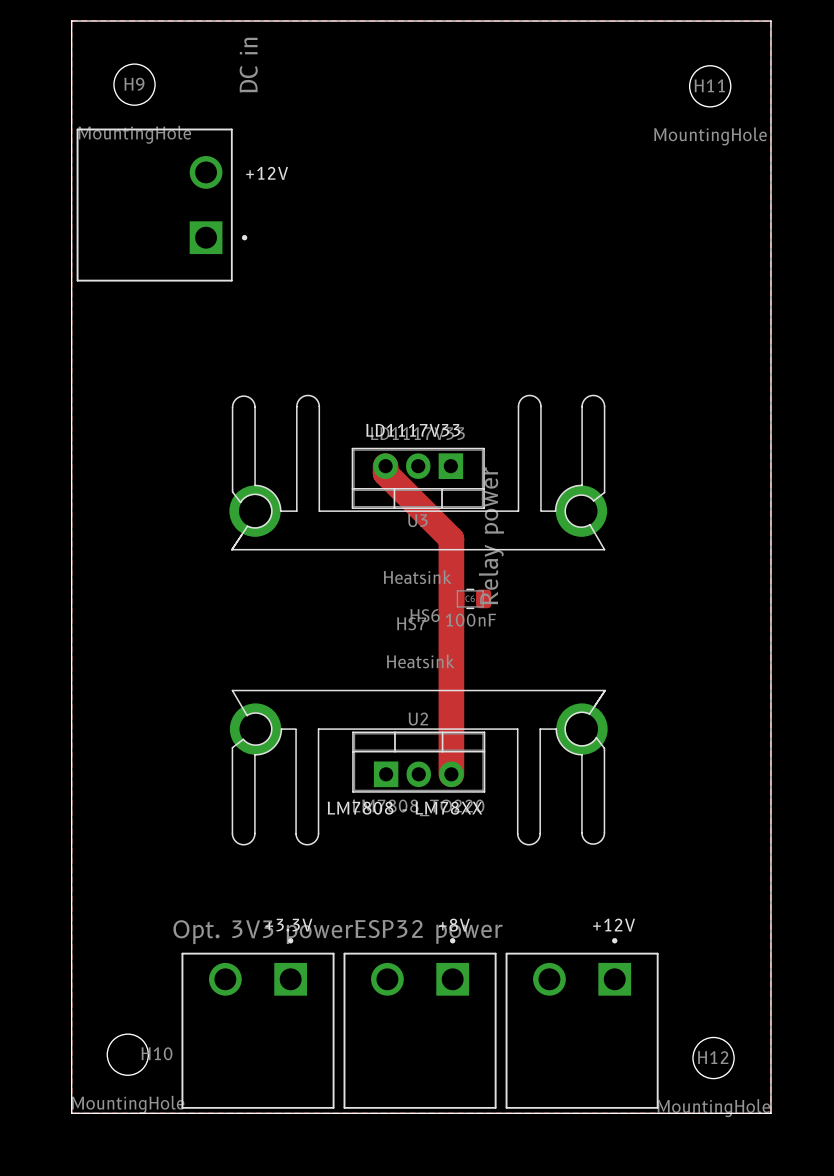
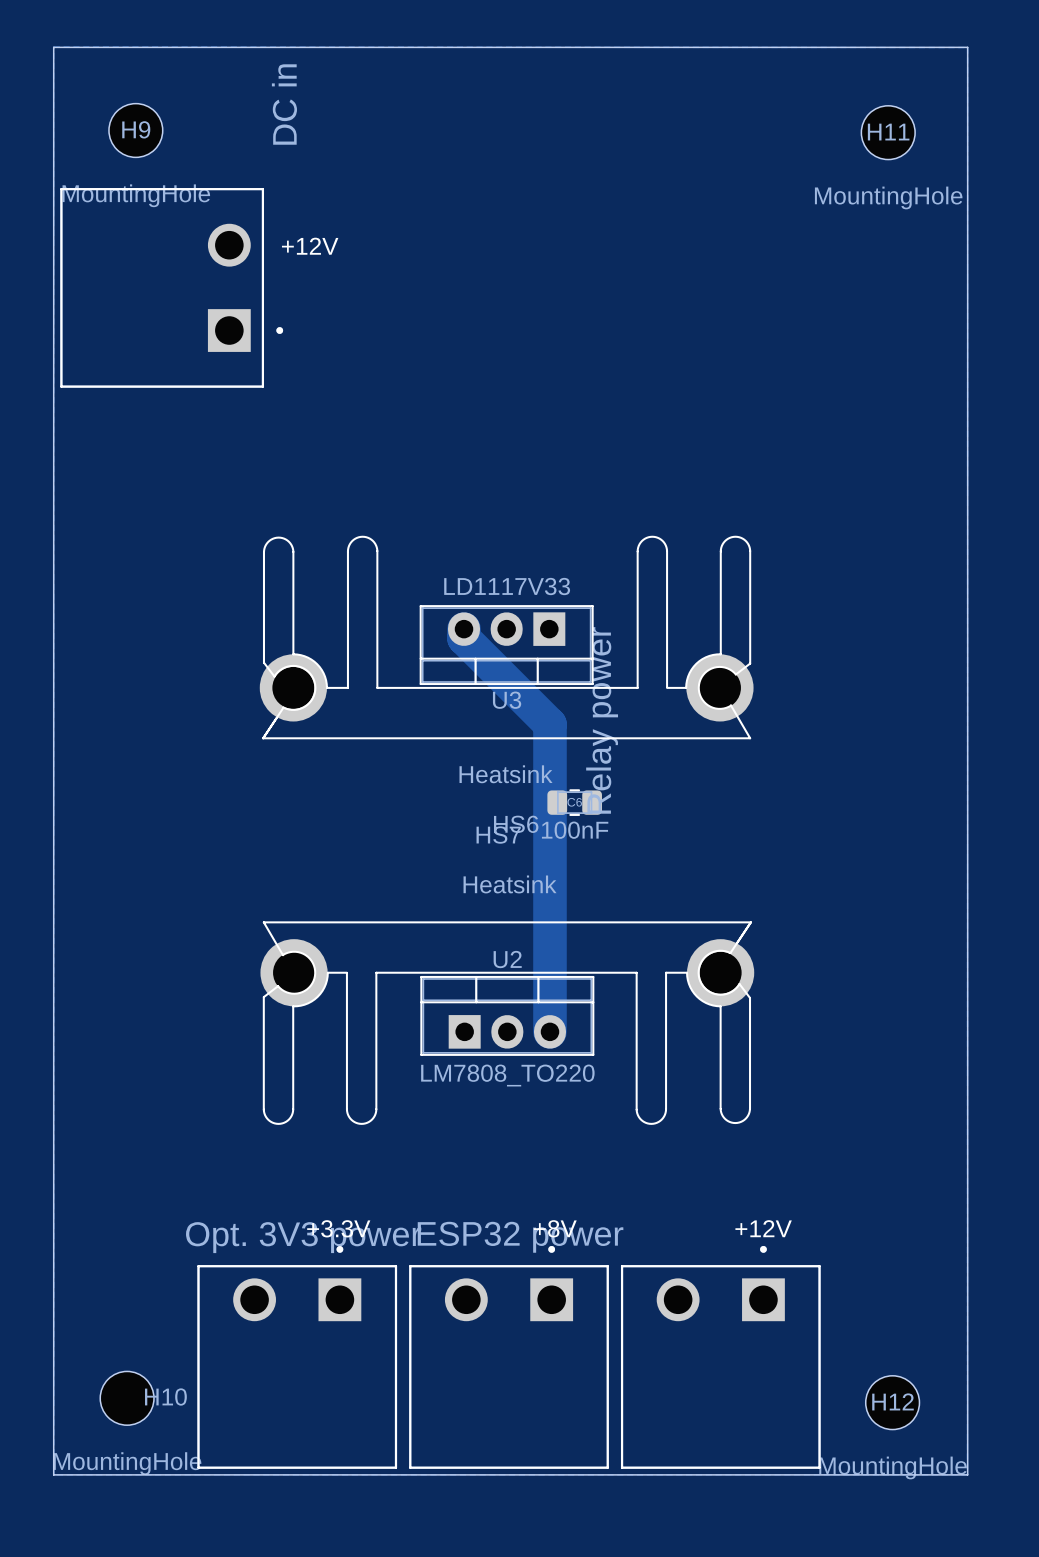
text: LD1117V33 (413, 430) -> none
text: LM7808 - LM78XX (404, 808) -> none

